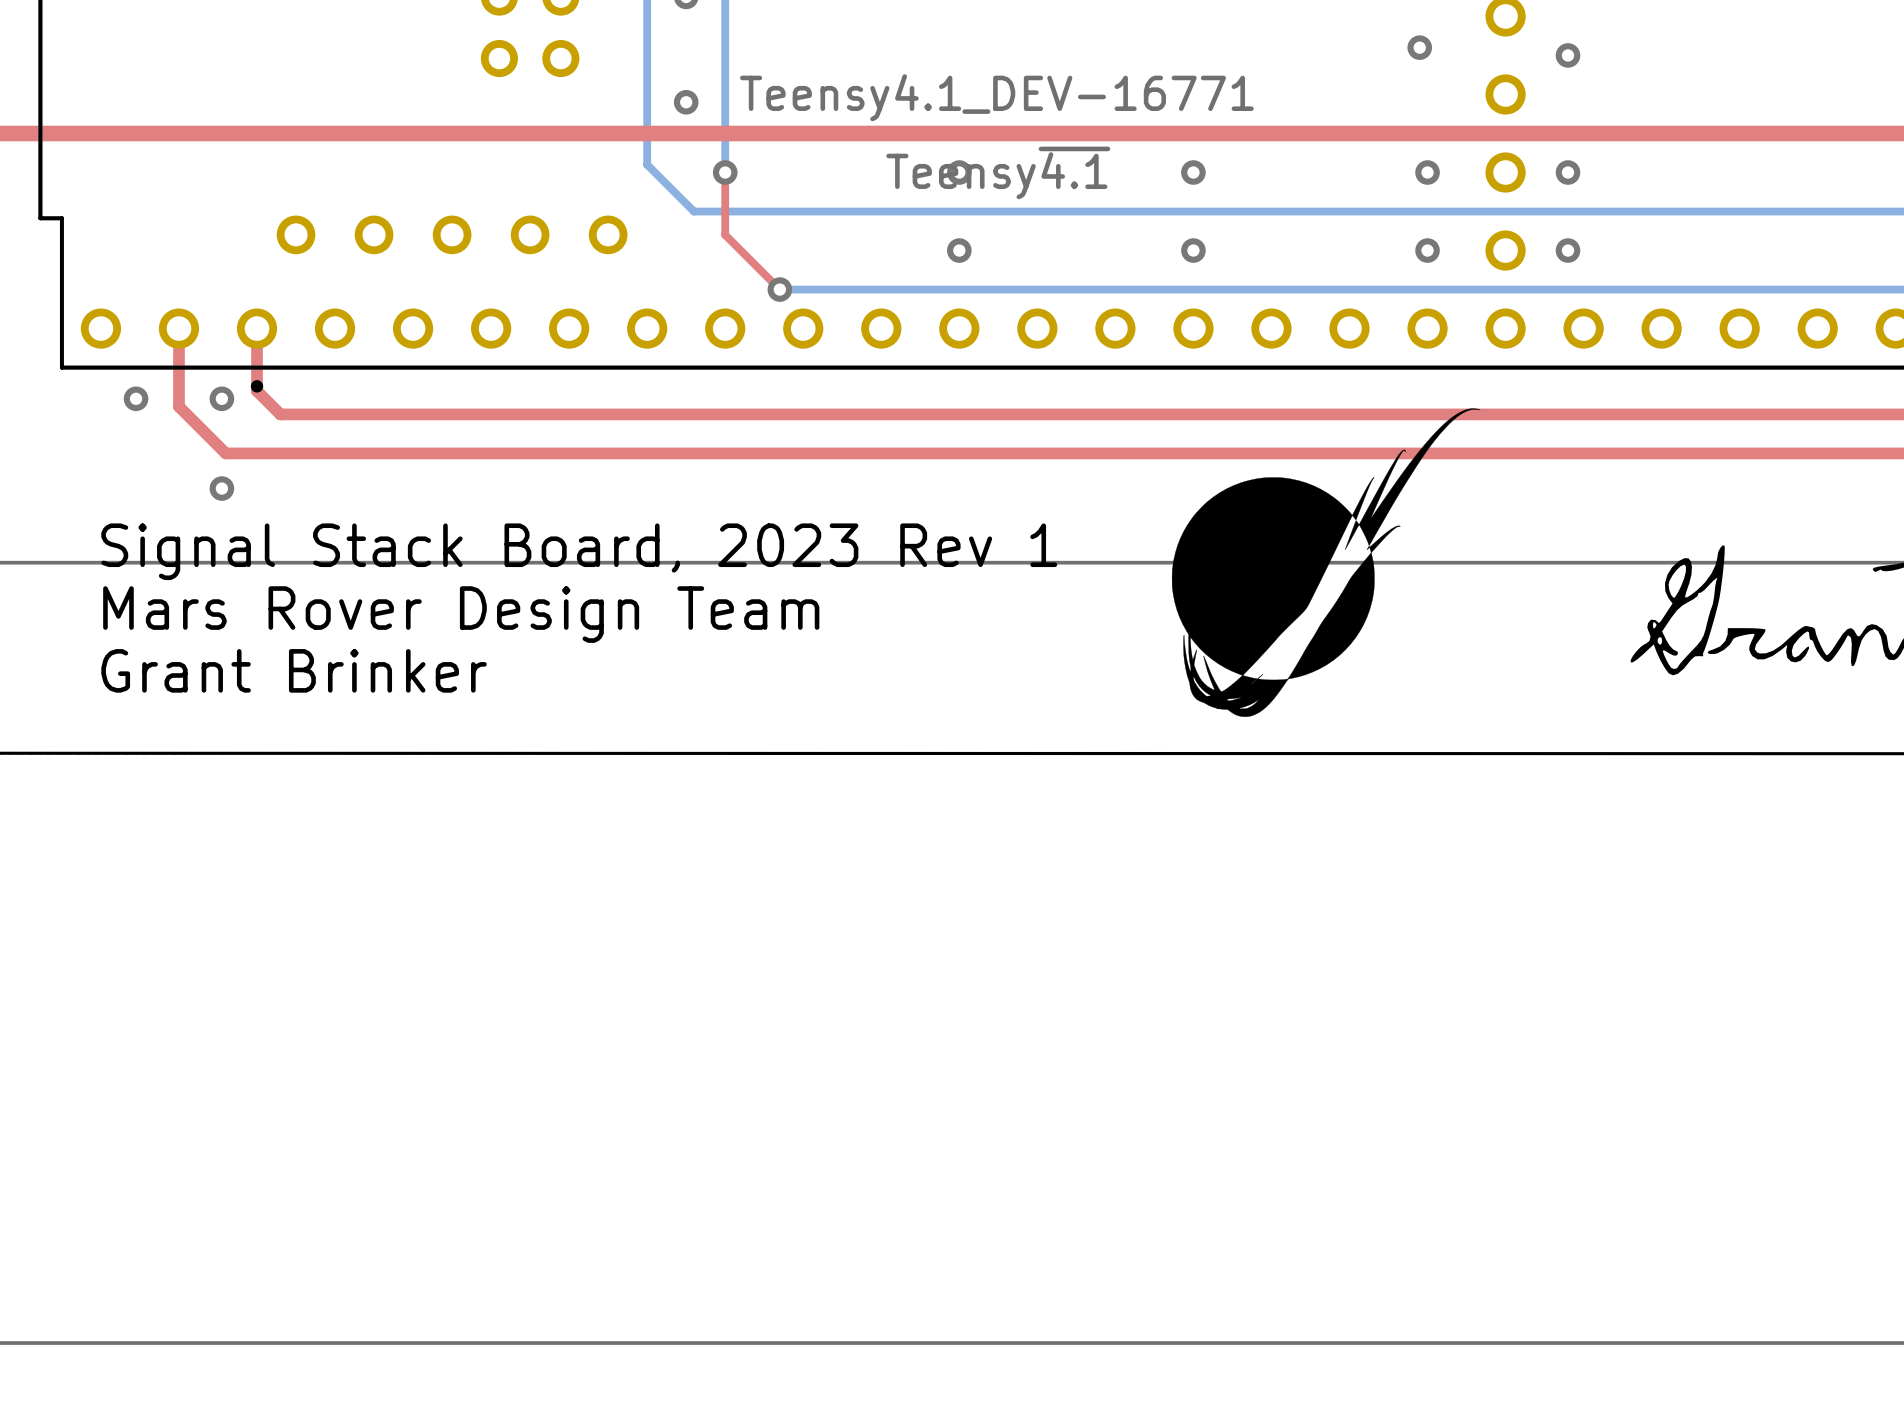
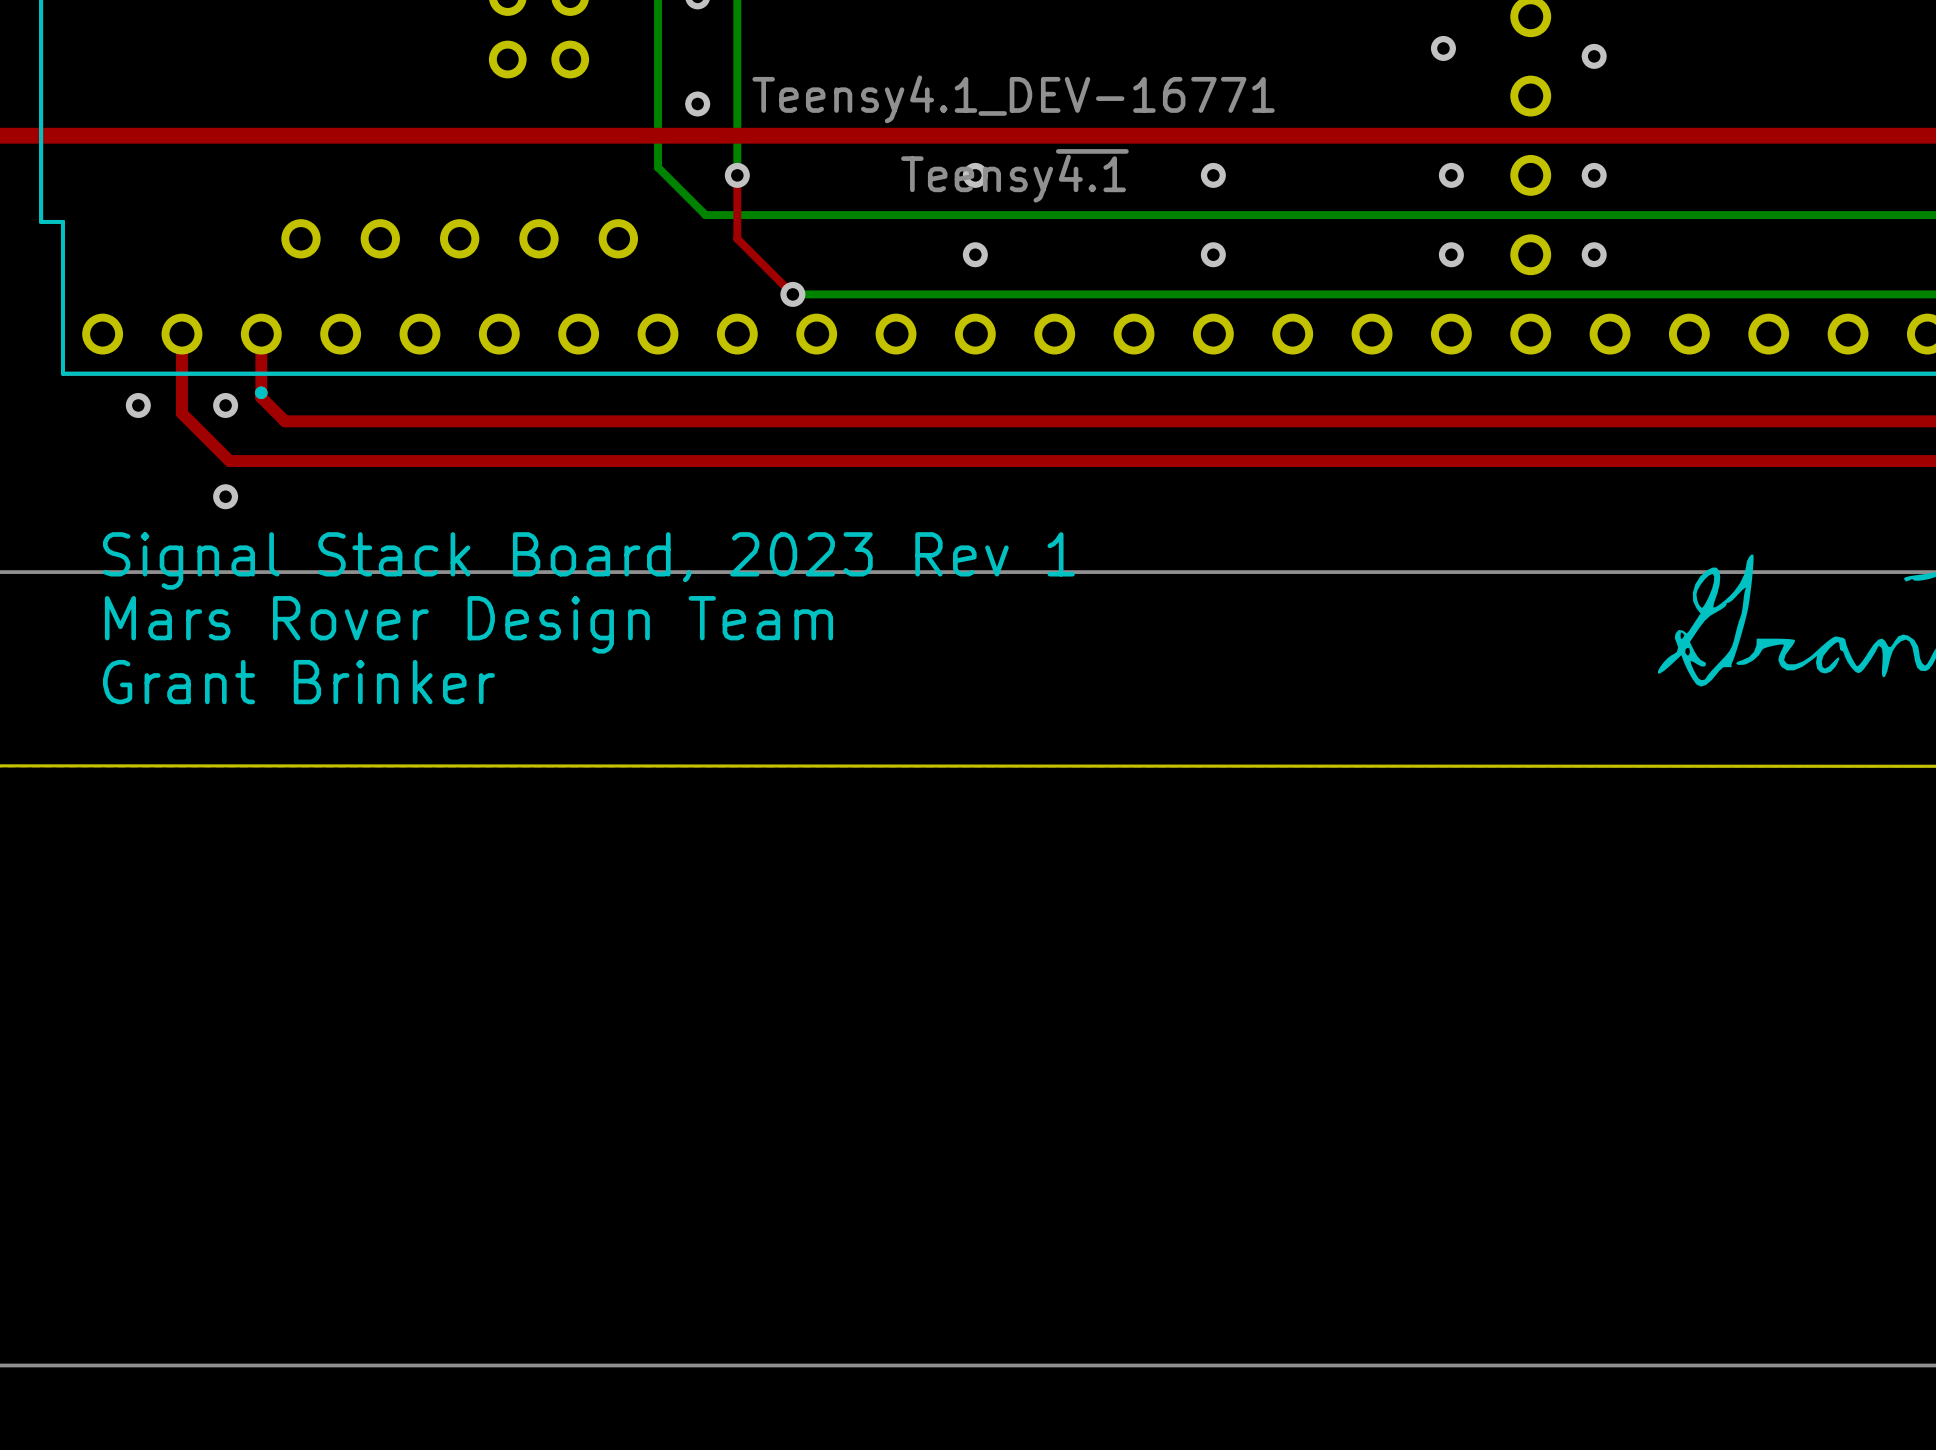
drawing: [1171, 408, 1481, 717] -> none

